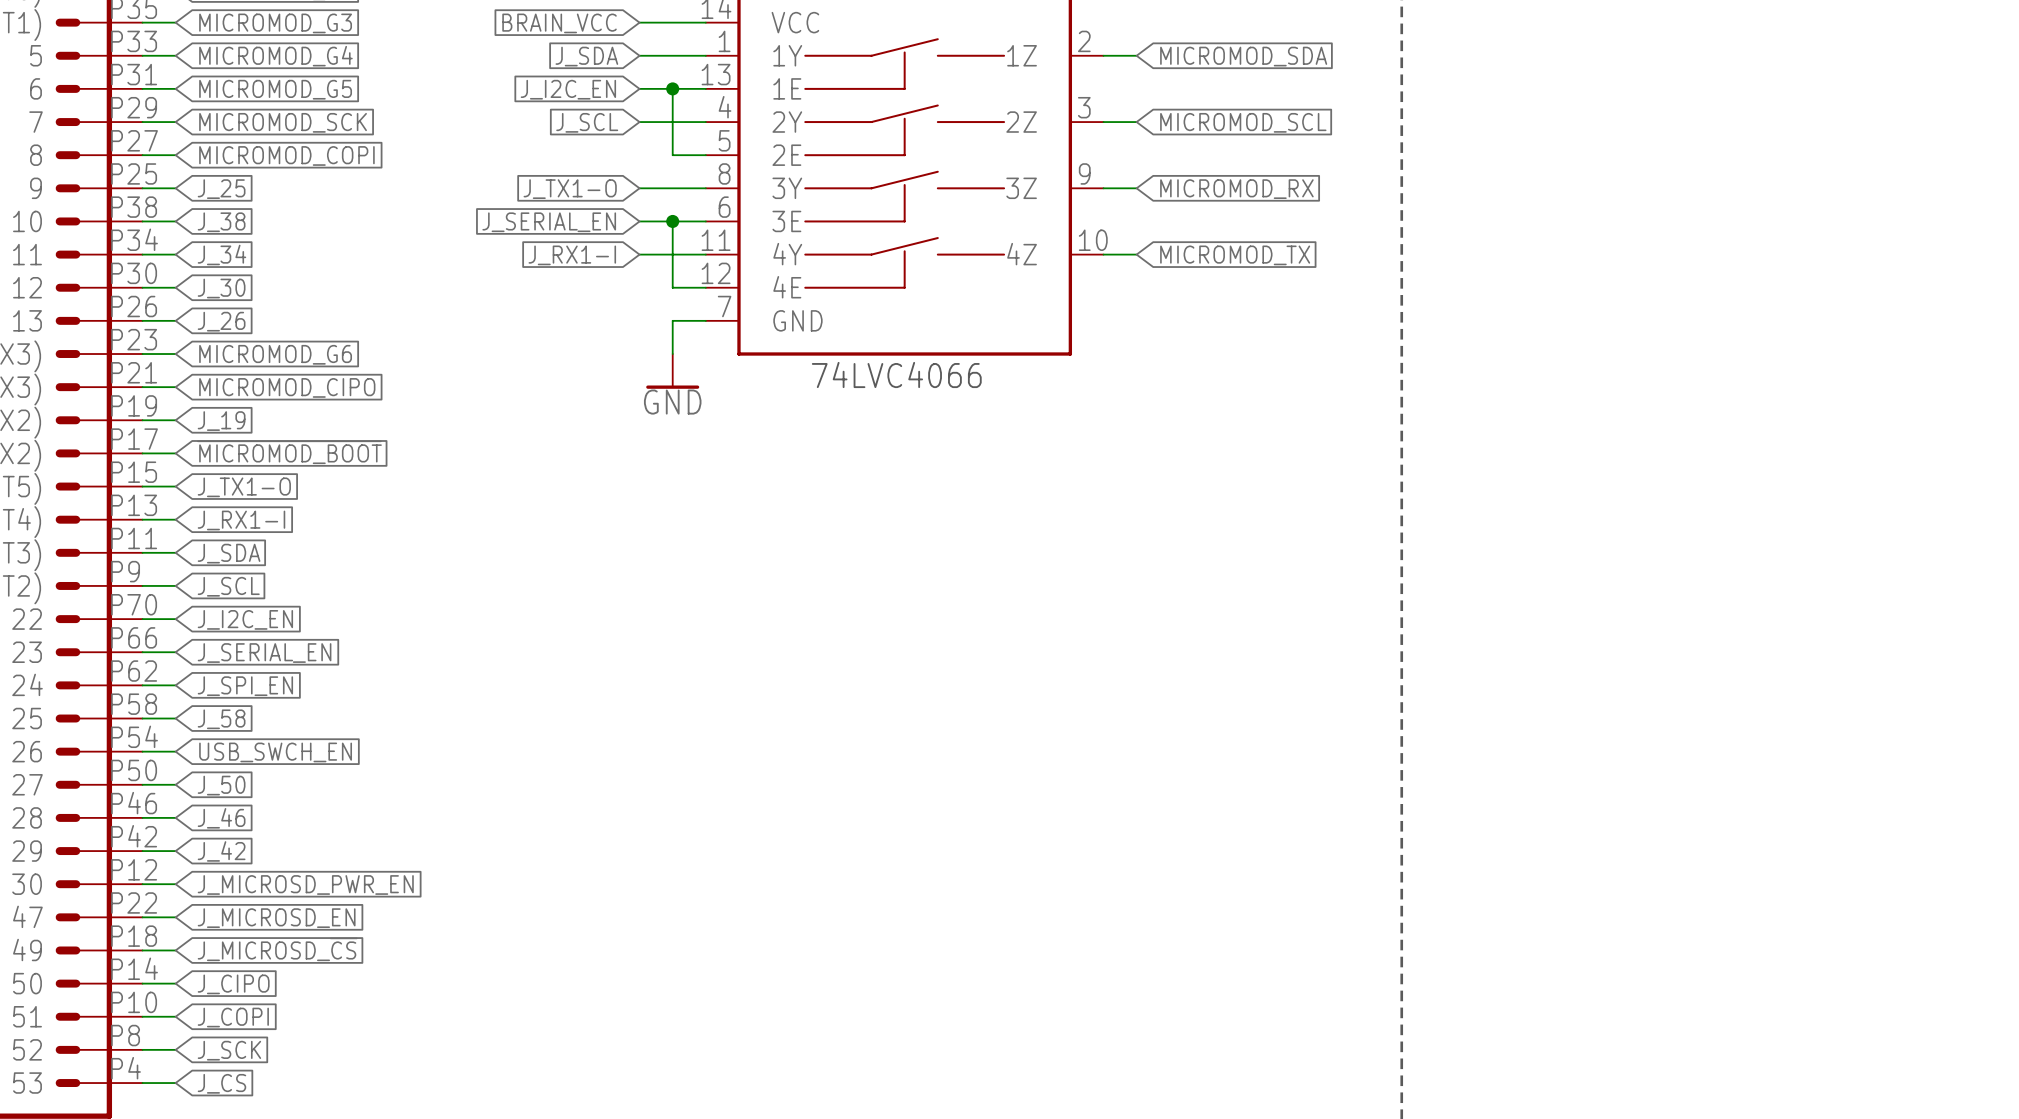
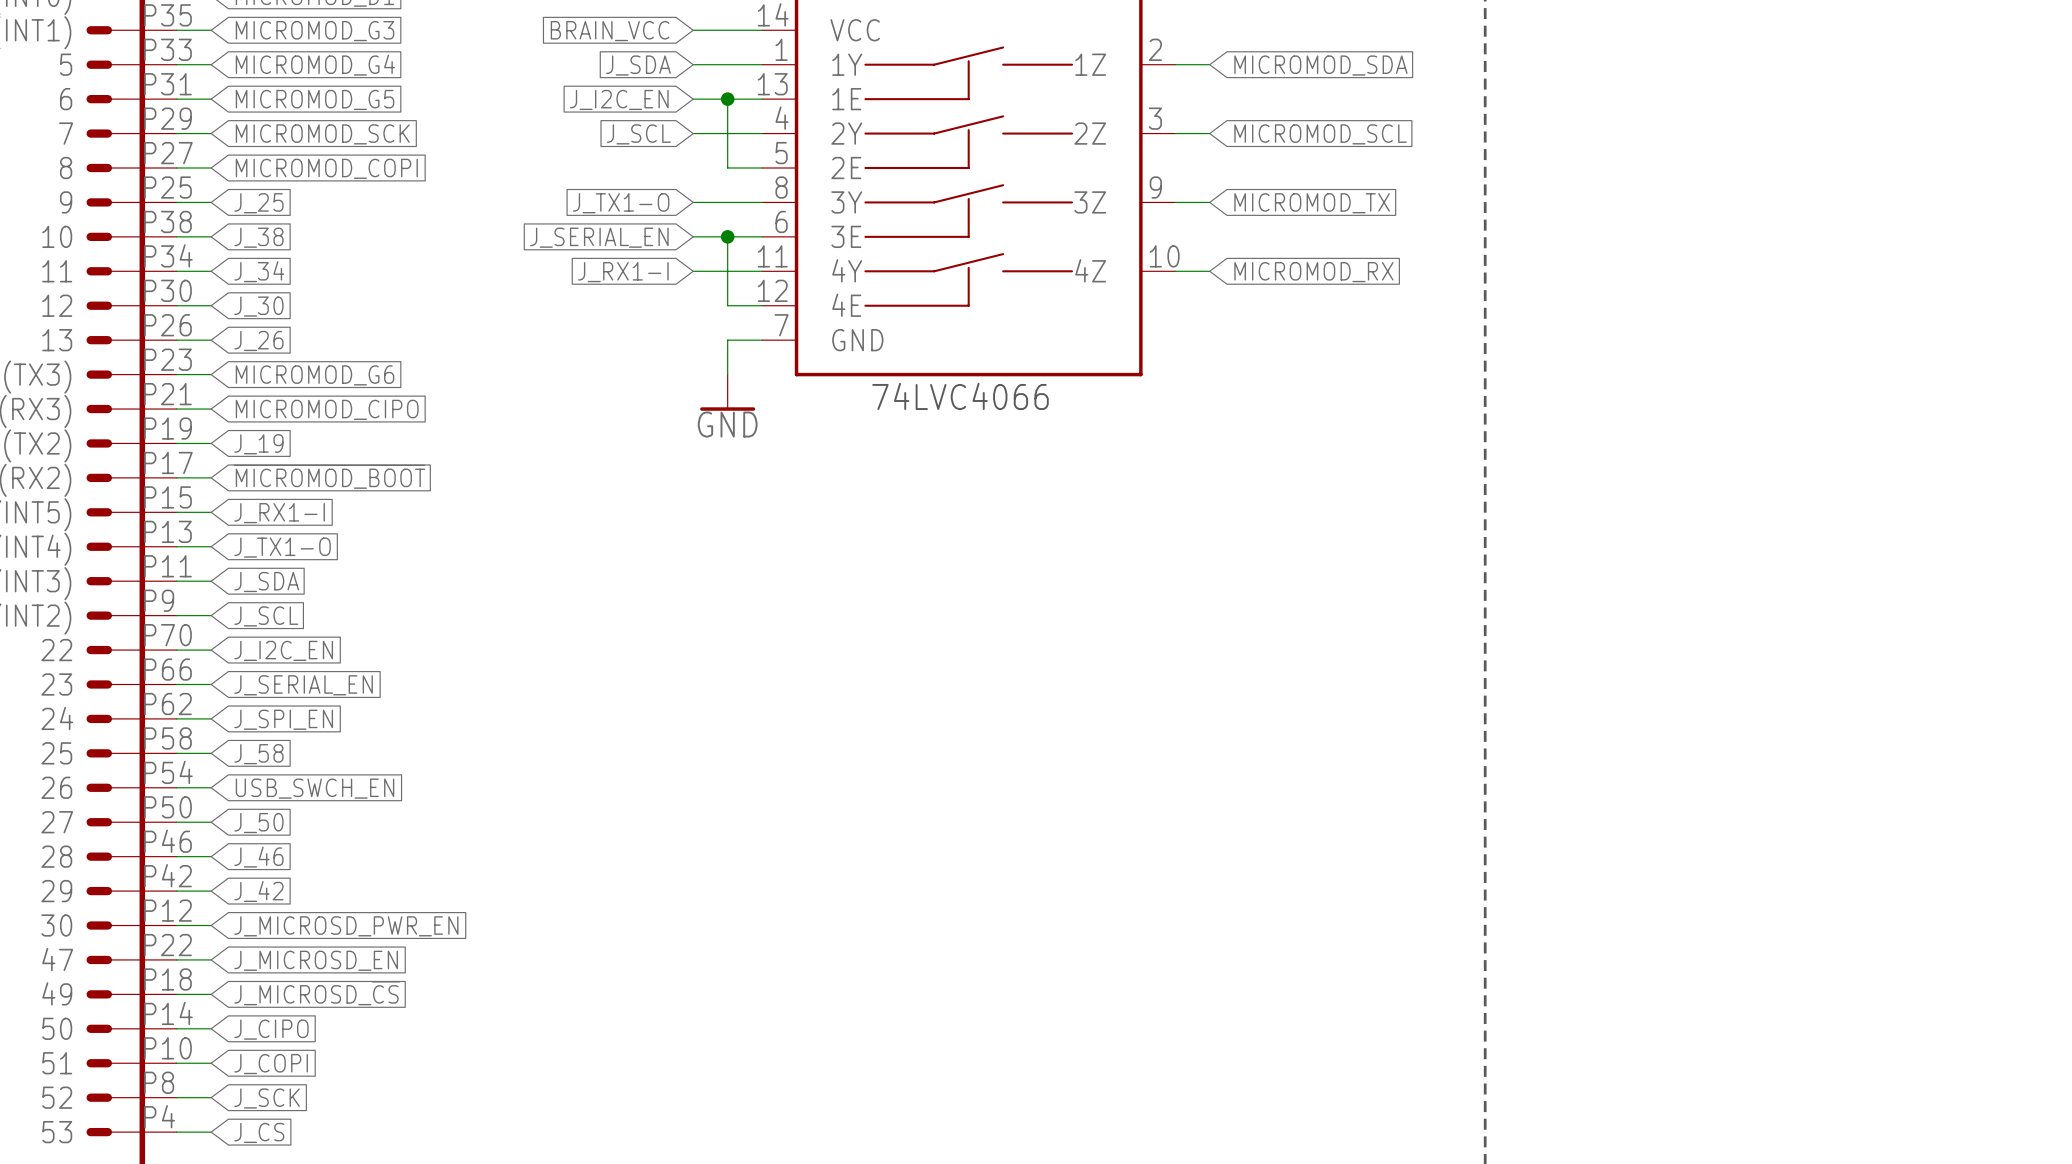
global label: MICROMOD_RX (1236, 189) -> MICROMOD_TX (1312, 203)
global label: MICROMOD_TX (1235, 255) -> MICROMOD_RX (1313, 272)
global label: J_TX1-O (244, 487) -> J_RX1-I (279, 513)
global label: J_RX1-I (241, 520) -> J_TX1-O (282, 547)

